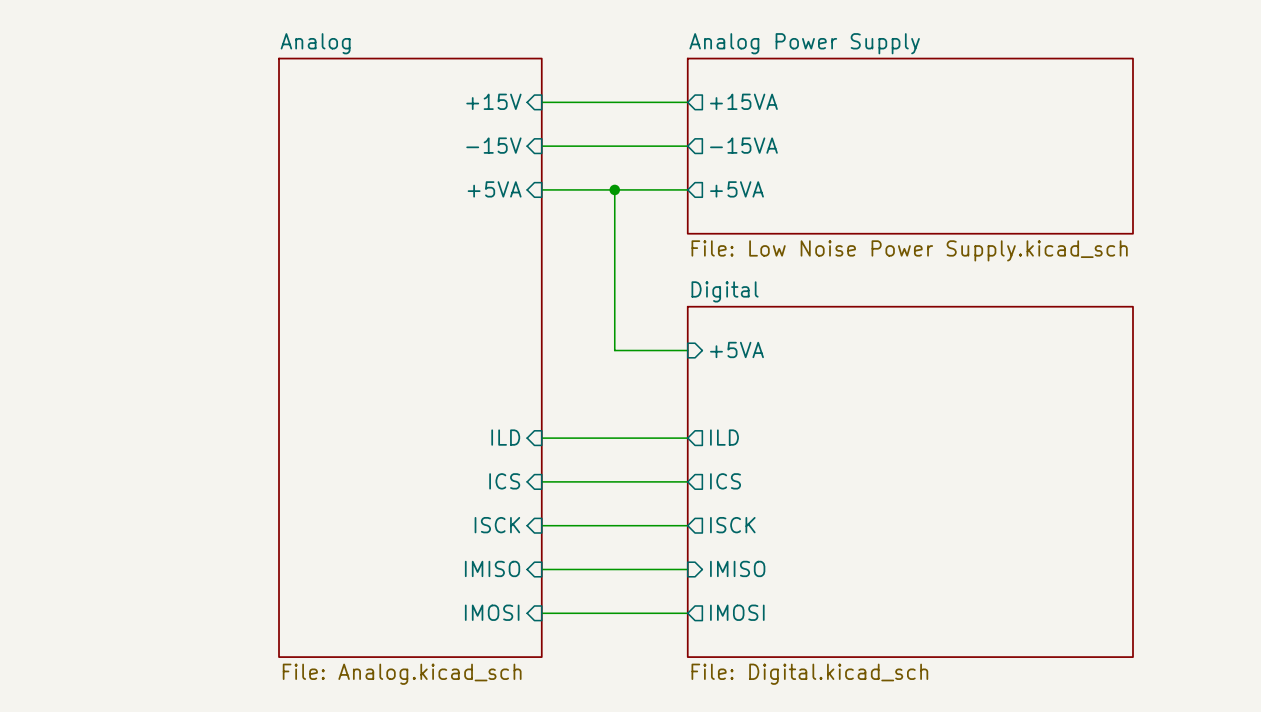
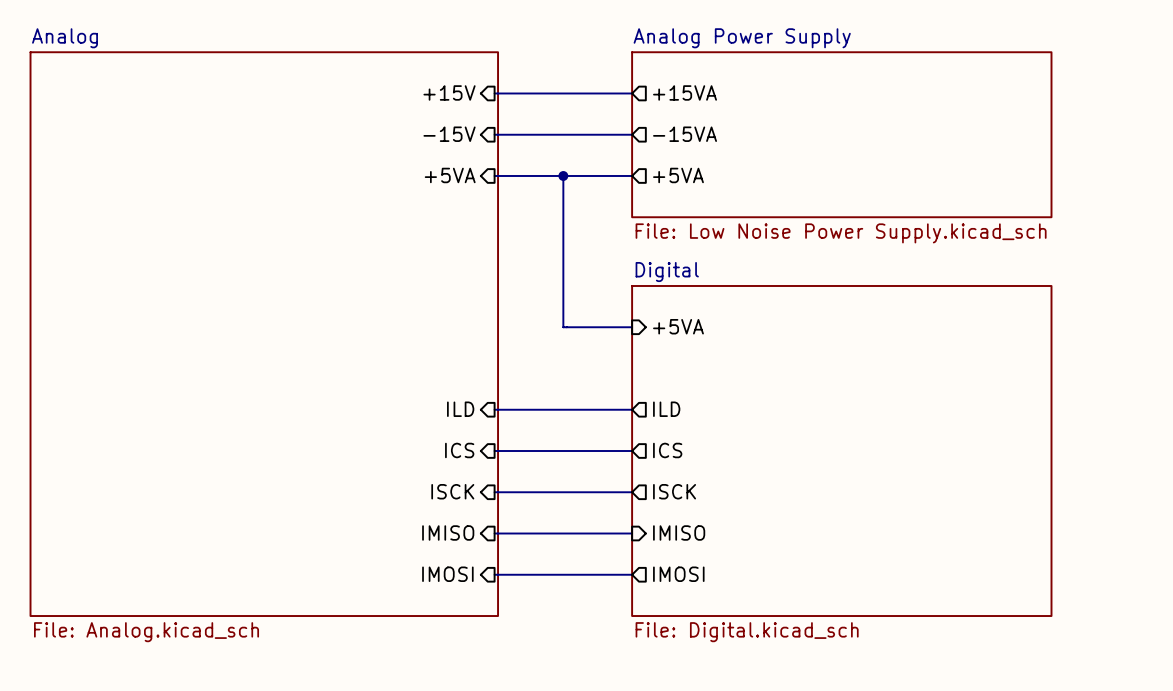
sheet Analog: none -> File: Analog.kicad_sch (264, 334)
sheet Analog: File: Analog.kicad_sch (410, 357) -> none

